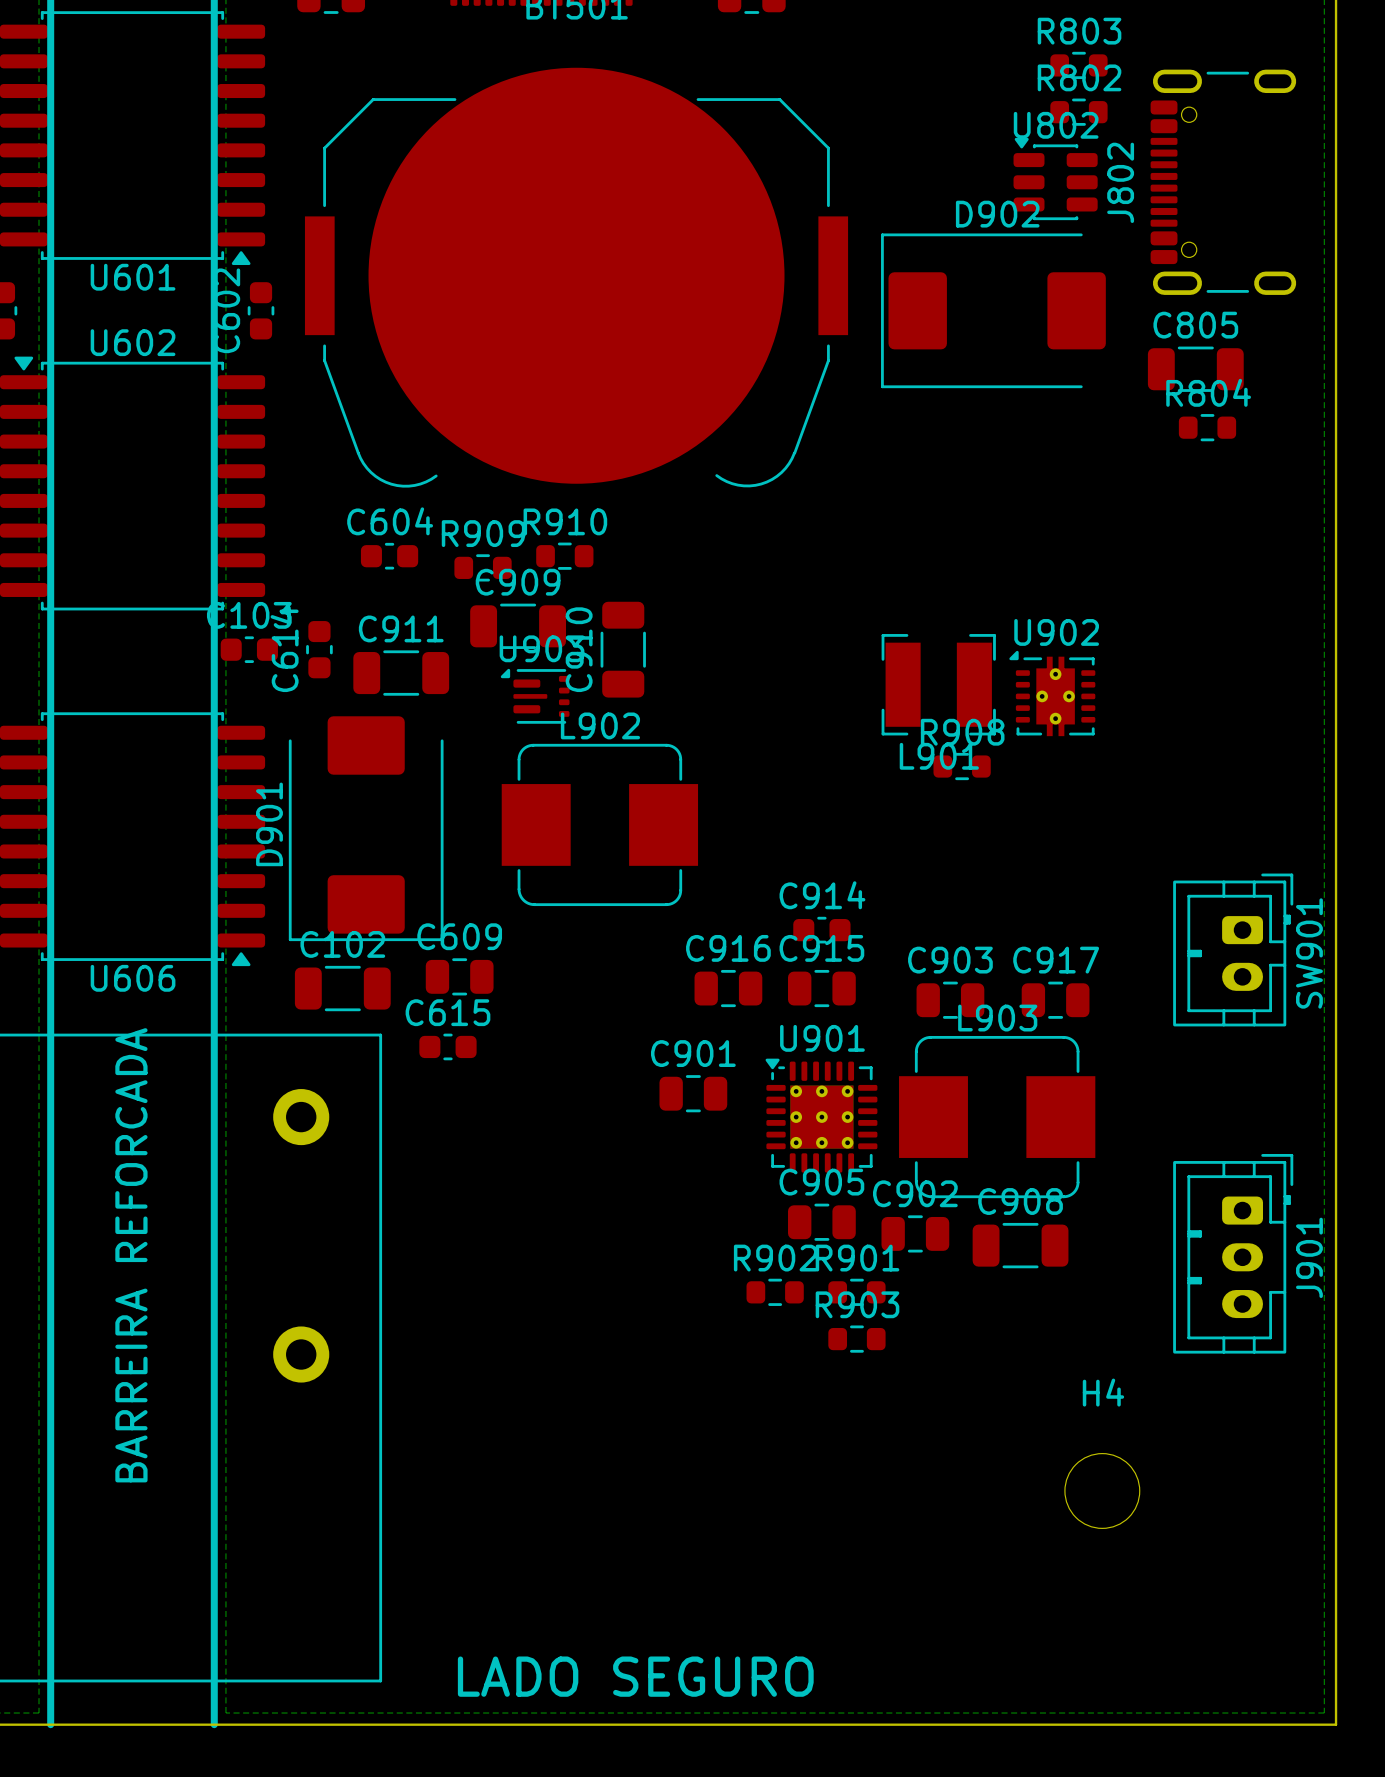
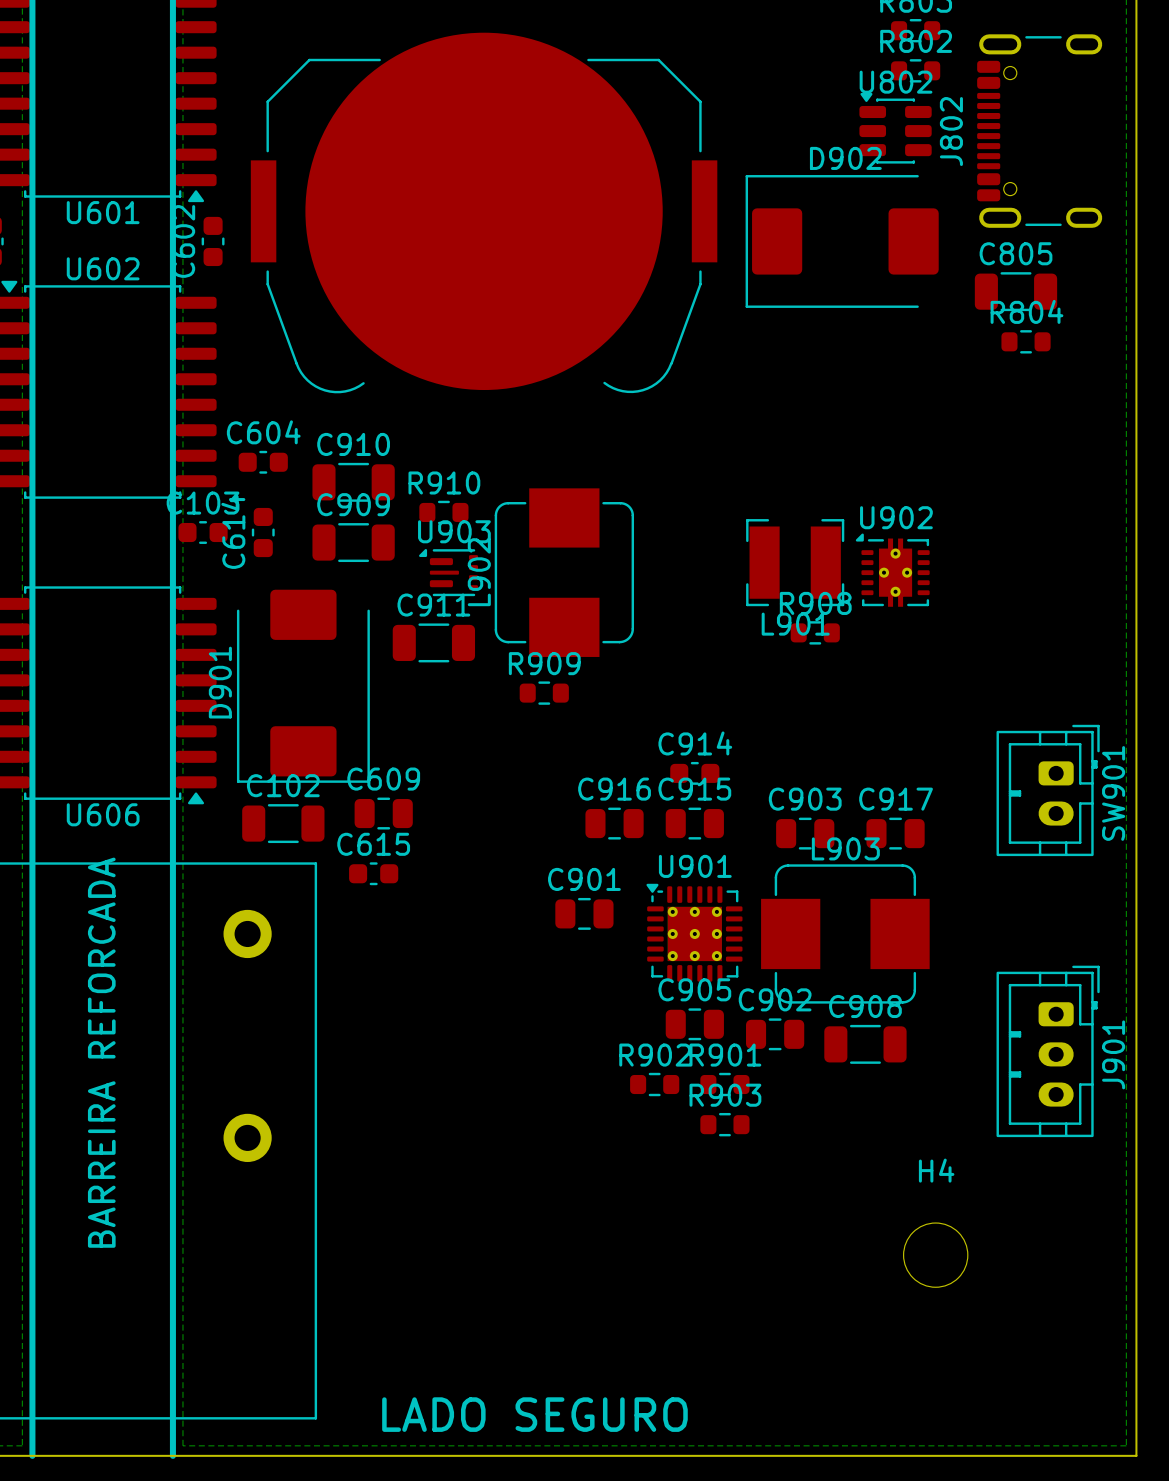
C604 position: (389, 556) -> (263, 462)
R910 position: (564, 556) -> (443, 512)
R909 position: (483, 567) -> (544, 693)
C909 position: (518, 626) -> (353, 542)
C910 rotation: 0° (623, 649) -> 90° clockwise (353, 482)
C910 position: (623, 649) -> (353, 482)
C911 position: (401, 673) -> (433, 642)
L902 rotation: 0° (599, 824) -> 90° counterclockwise (564, 572)
L902 position: (599, 824) -> (564, 572)

